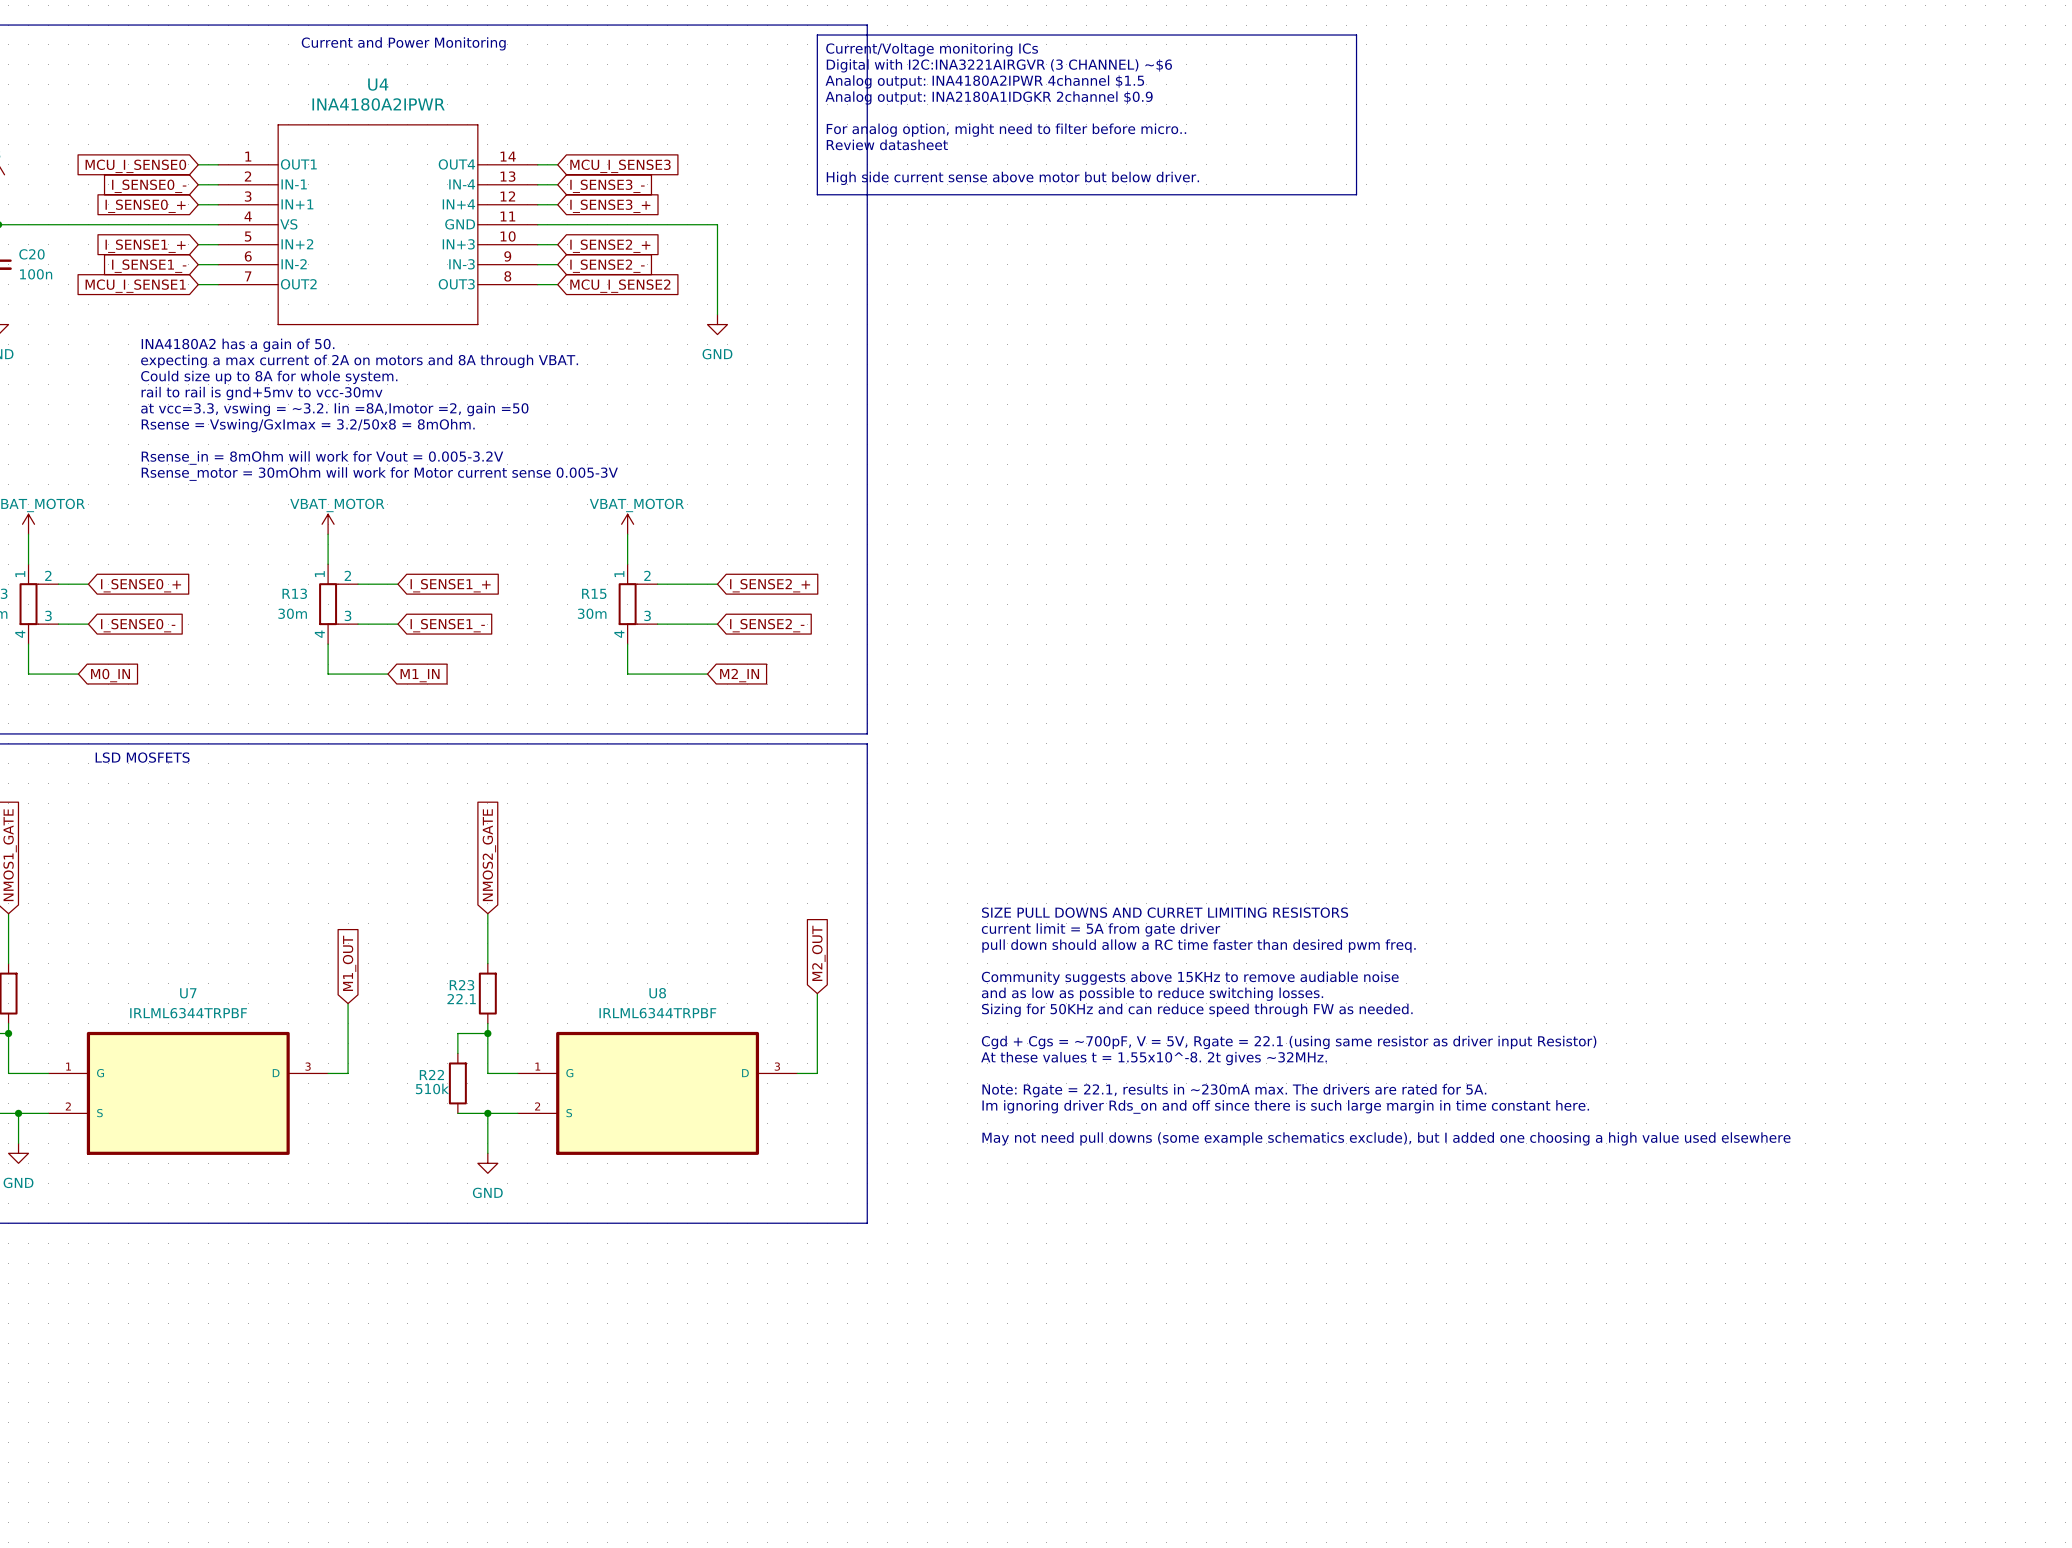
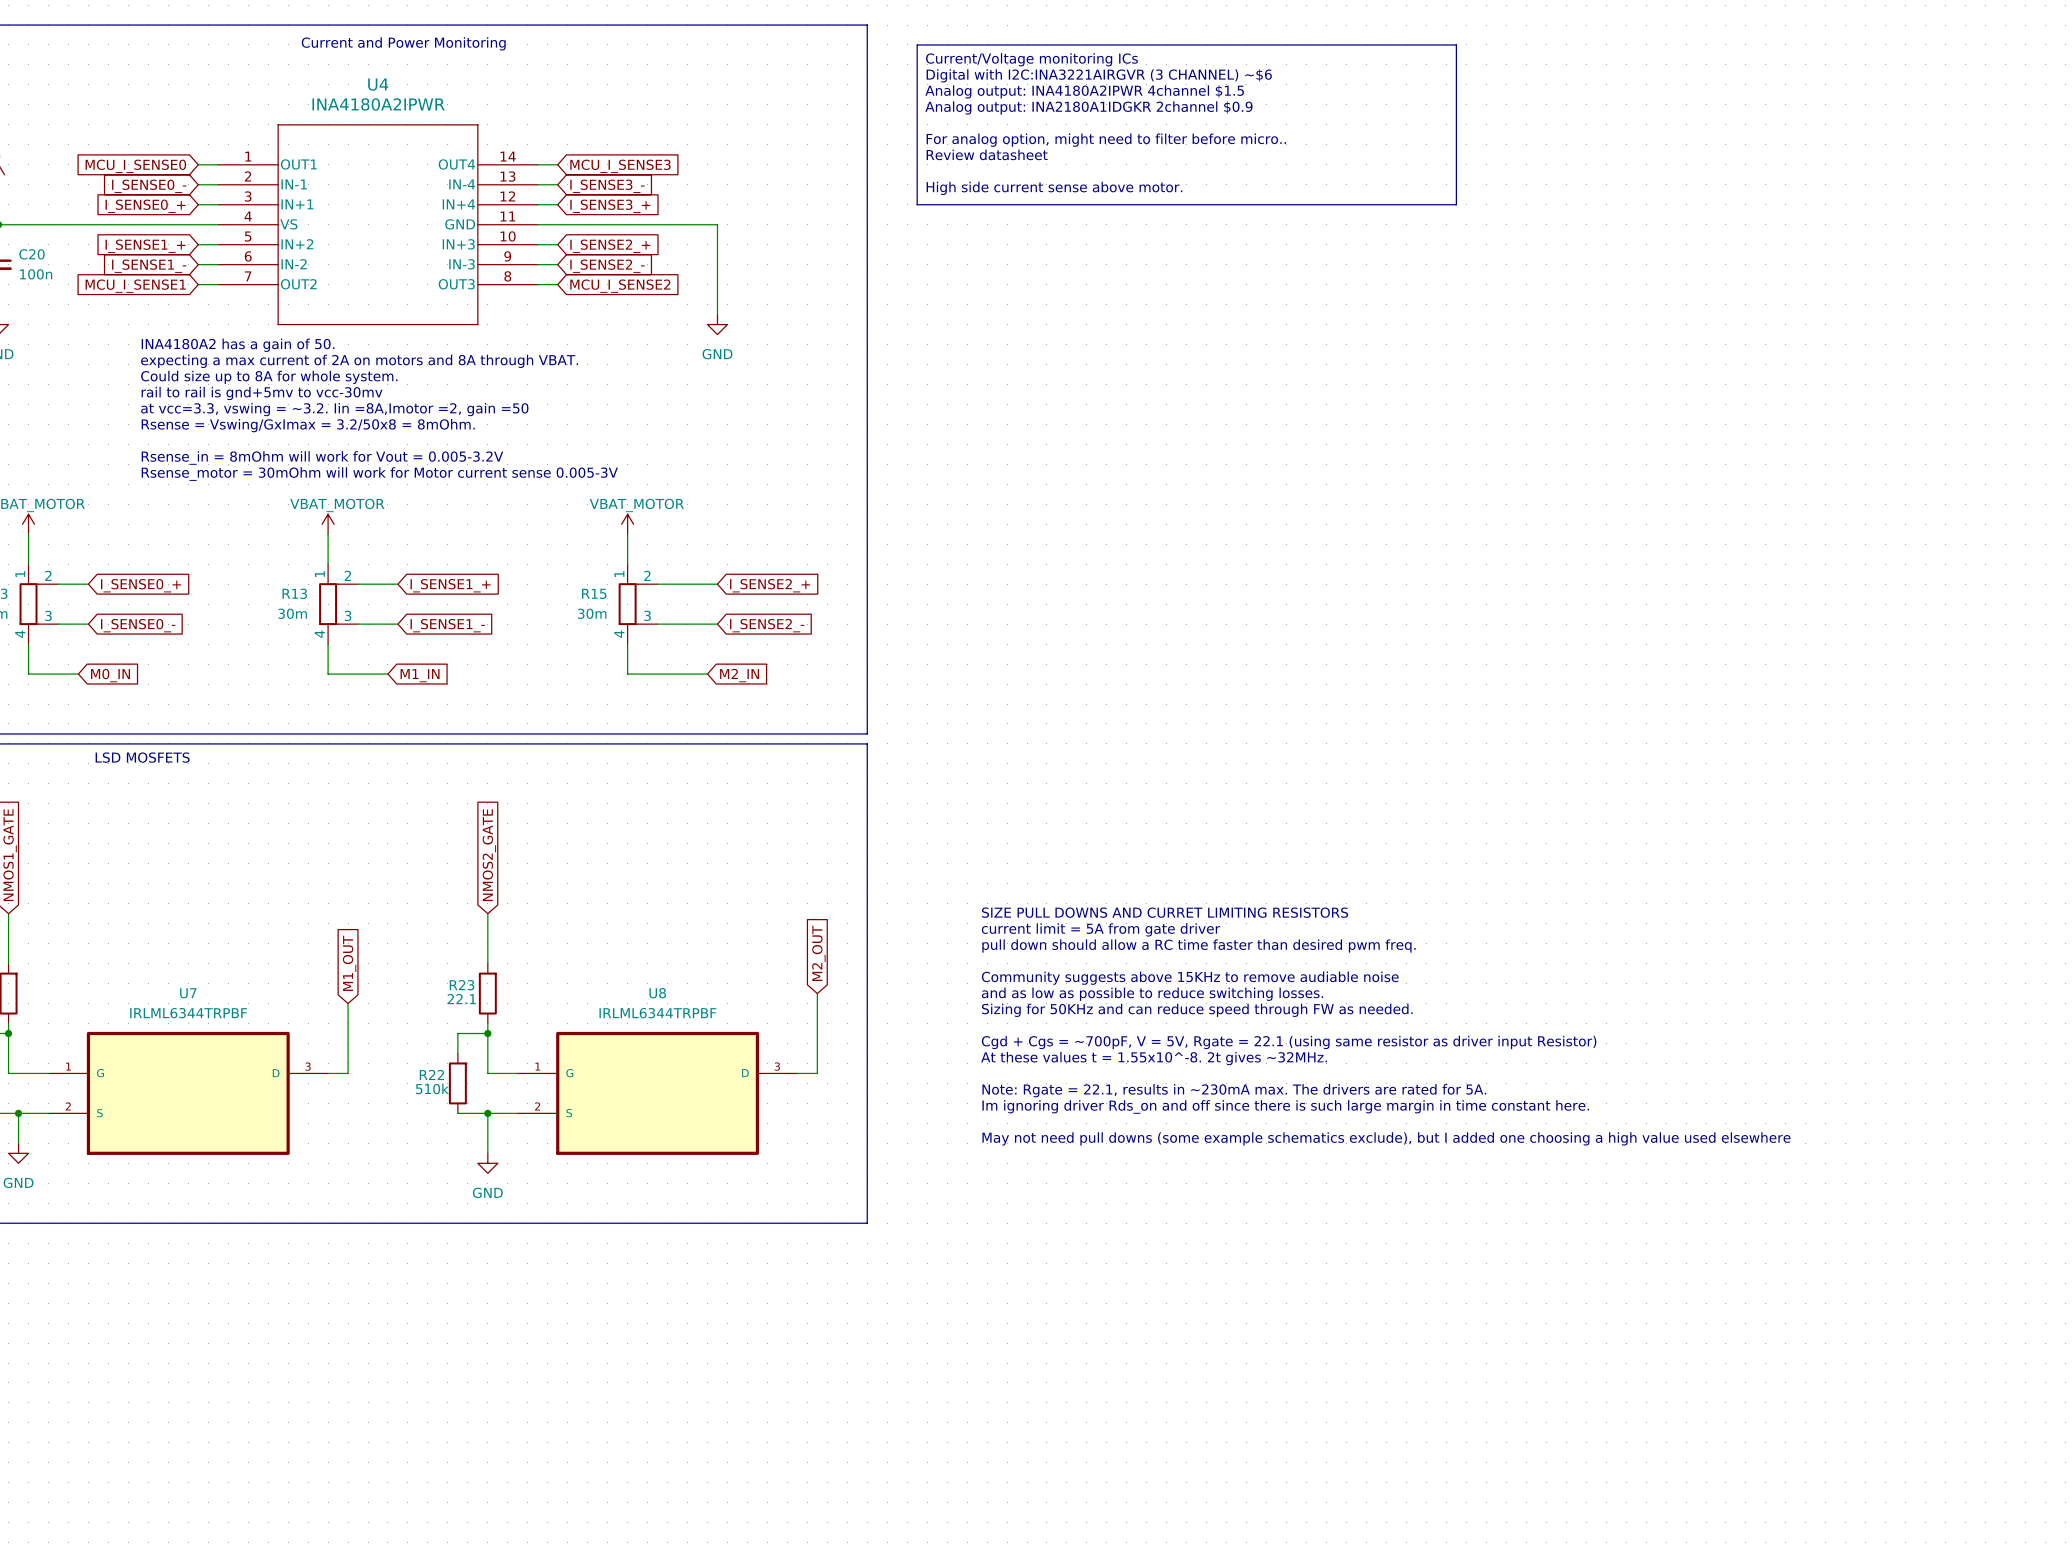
line: (817, 35) (1356, 35) (1356, 194) (817, 194) (817, 35) -> (917, 44) (917, 204) (1456, 204) (1456, 44) (917, 44)
text position: Current/Voltage monitoring ICs (932, 49) -> Current/Voltage monitoring ICs (1031, 59)
text position: Digital with I2C:INA3221AIRGVR (3 CHANNEL) ~$6 (999, 65) -> Digital with I2C:INA3221AIRGVR (3 CHANNEL) ~$6 (1099, 75)
text position: Analog output: INA4180A2IPWR 4channel $1.5 (984, 81) -> Analog output: INA4180A2IPWR 4channel $1.5 (1084, 91)
text position: Analog output: INA2180A1IDGKR 2channel $0.9 (989, 98) -> Analog output: INA2180A1IDGKR 2channel $0.9 (1088, 107)
text position: For analog option, might need to filter before micro.. (1006, 130) -> For analog option, might need to filter before micro.. (1106, 140)
text position: Review datasheet (887, 144) -> Review datasheet (987, 154)
text: High side current sense above motor but below driver. (1012, 178) -> High side current sense above motor. (1054, 188)

